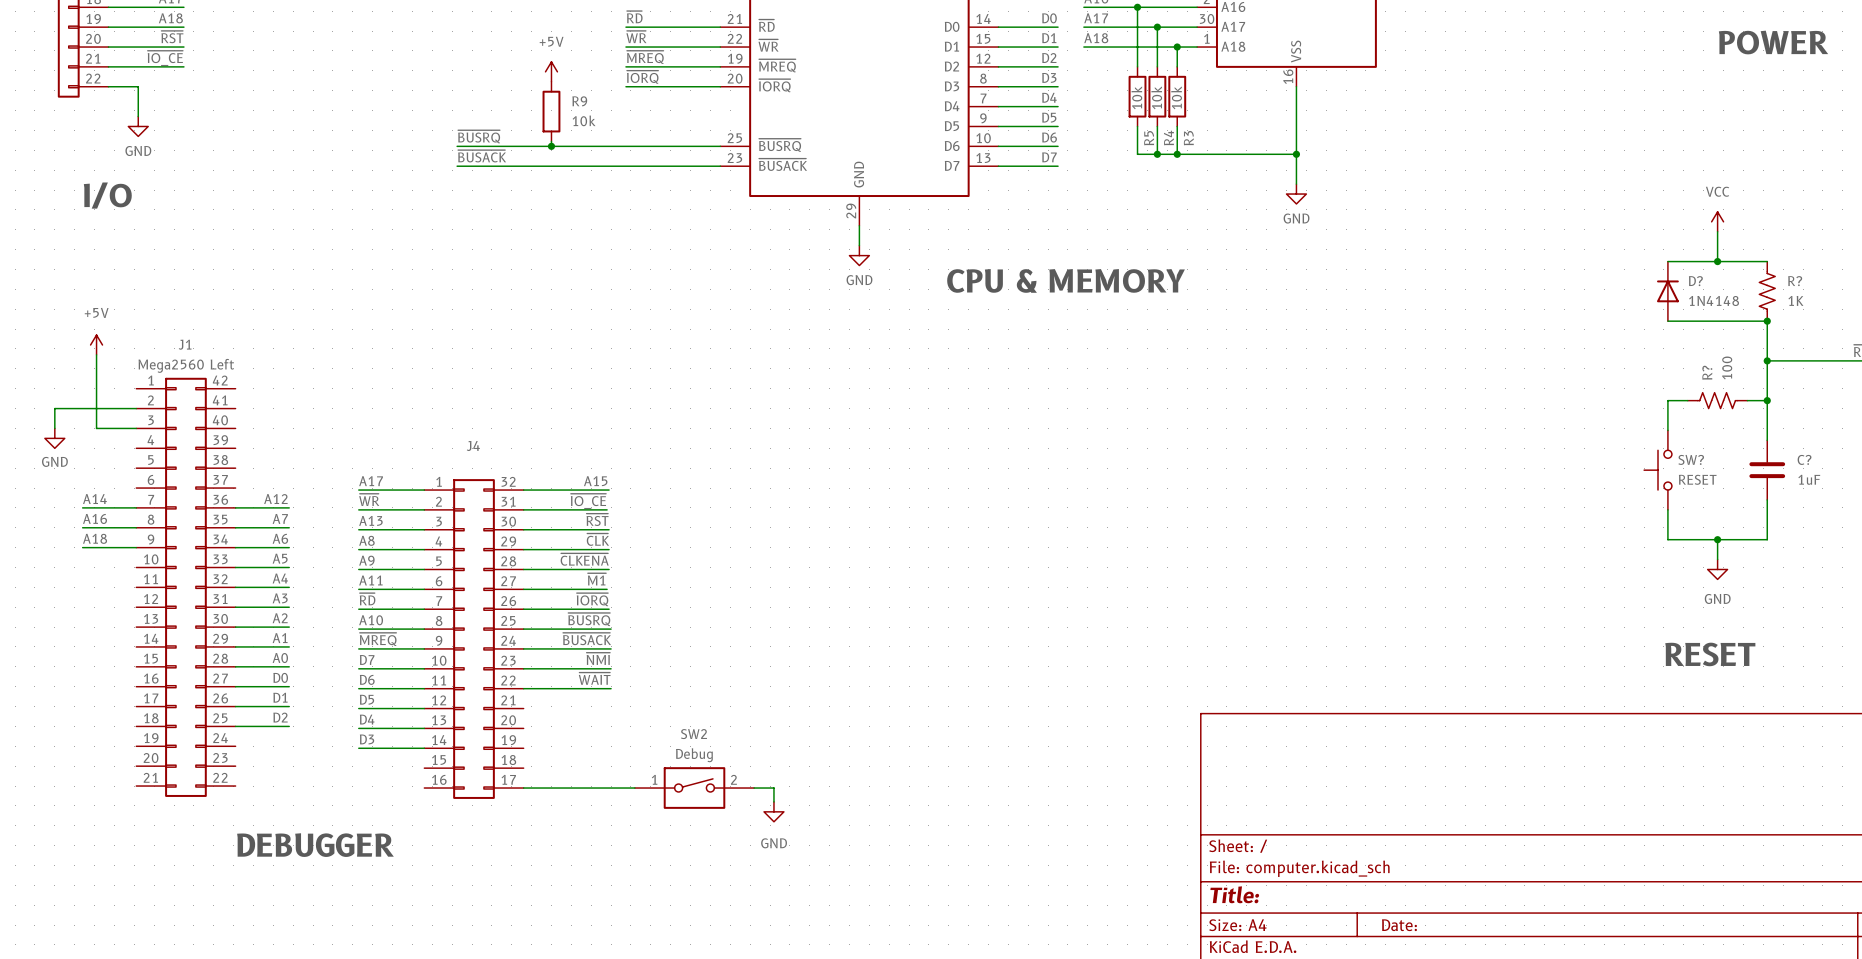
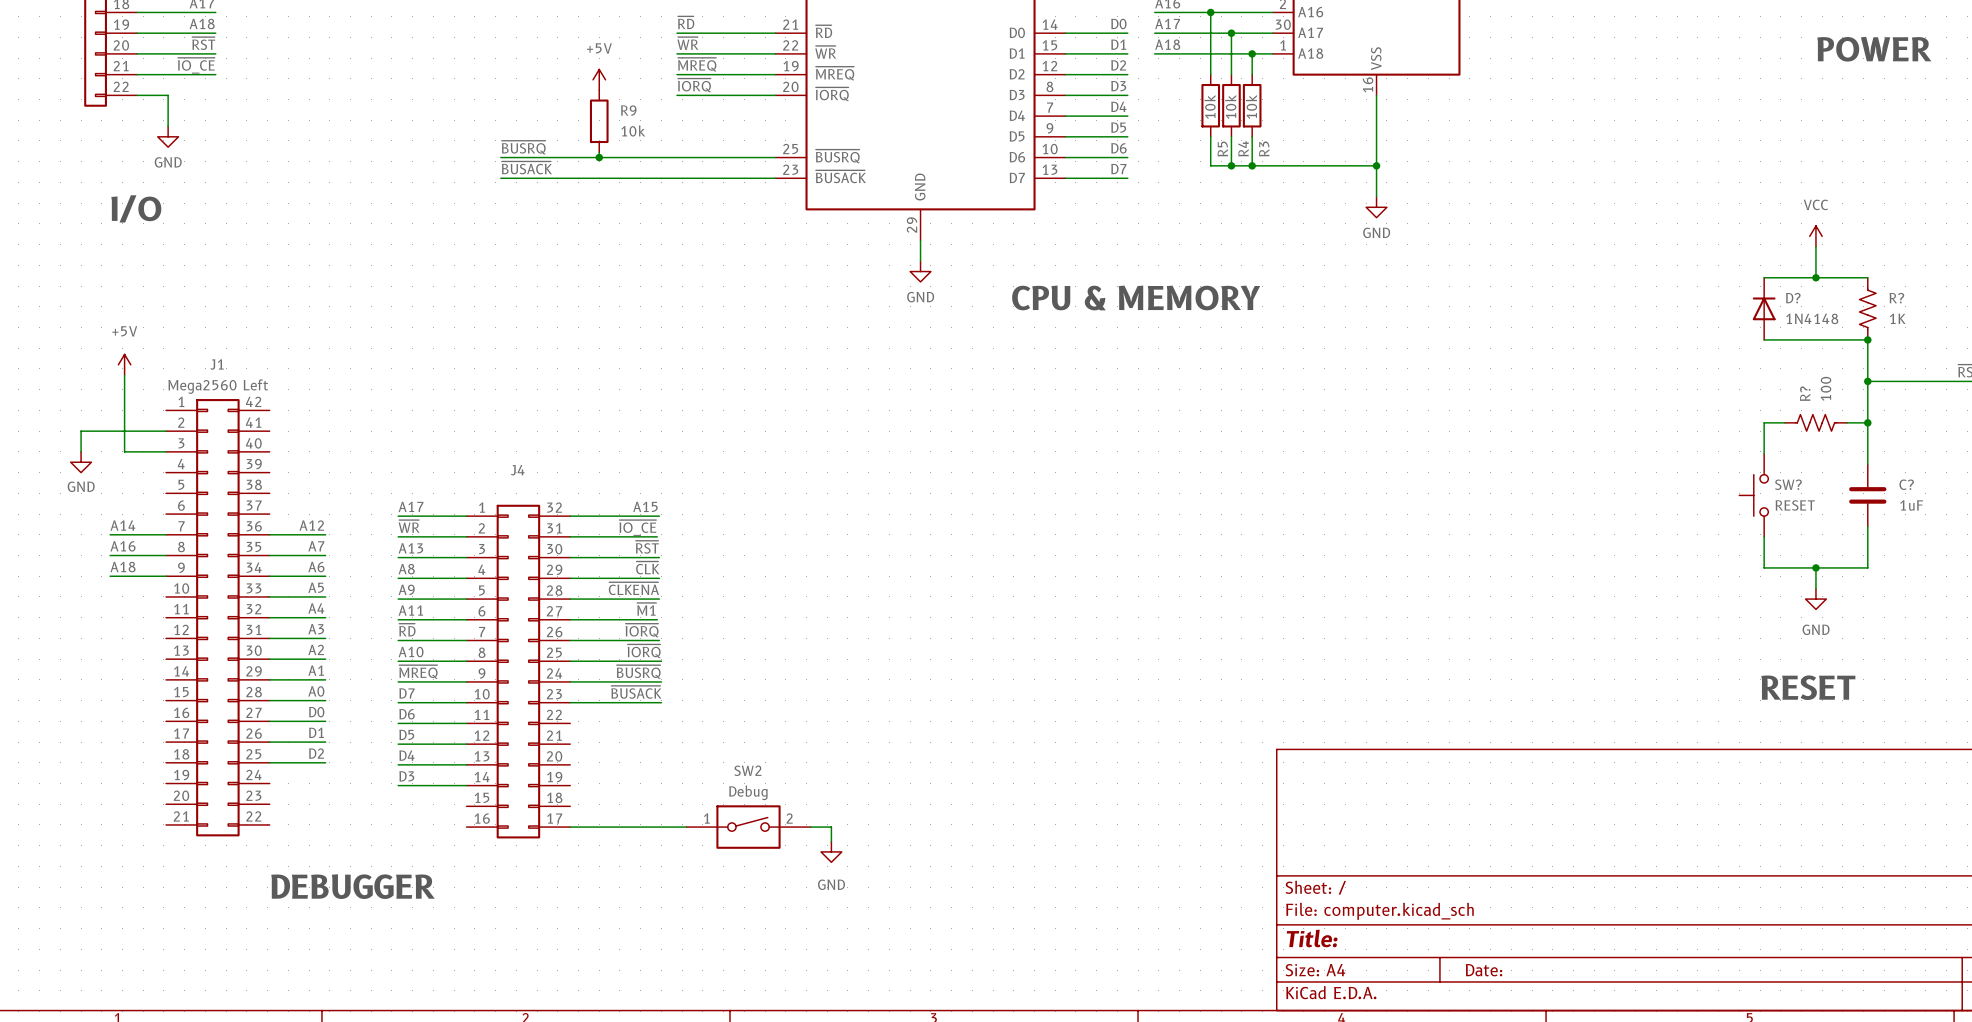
label: ~{BUSRQ} (589, 619) -> ~{IORQ} (644, 651)
label: ~{BUSACK} (587, 639) -> ~{BUSRQ} (638, 672)
label: ~{NMI} (598, 658) -> ~{BUSACK} (636, 692)
label: ~{WAIT} (594, 678) -> none
wire: (523, 688) (611, 688) -> none

